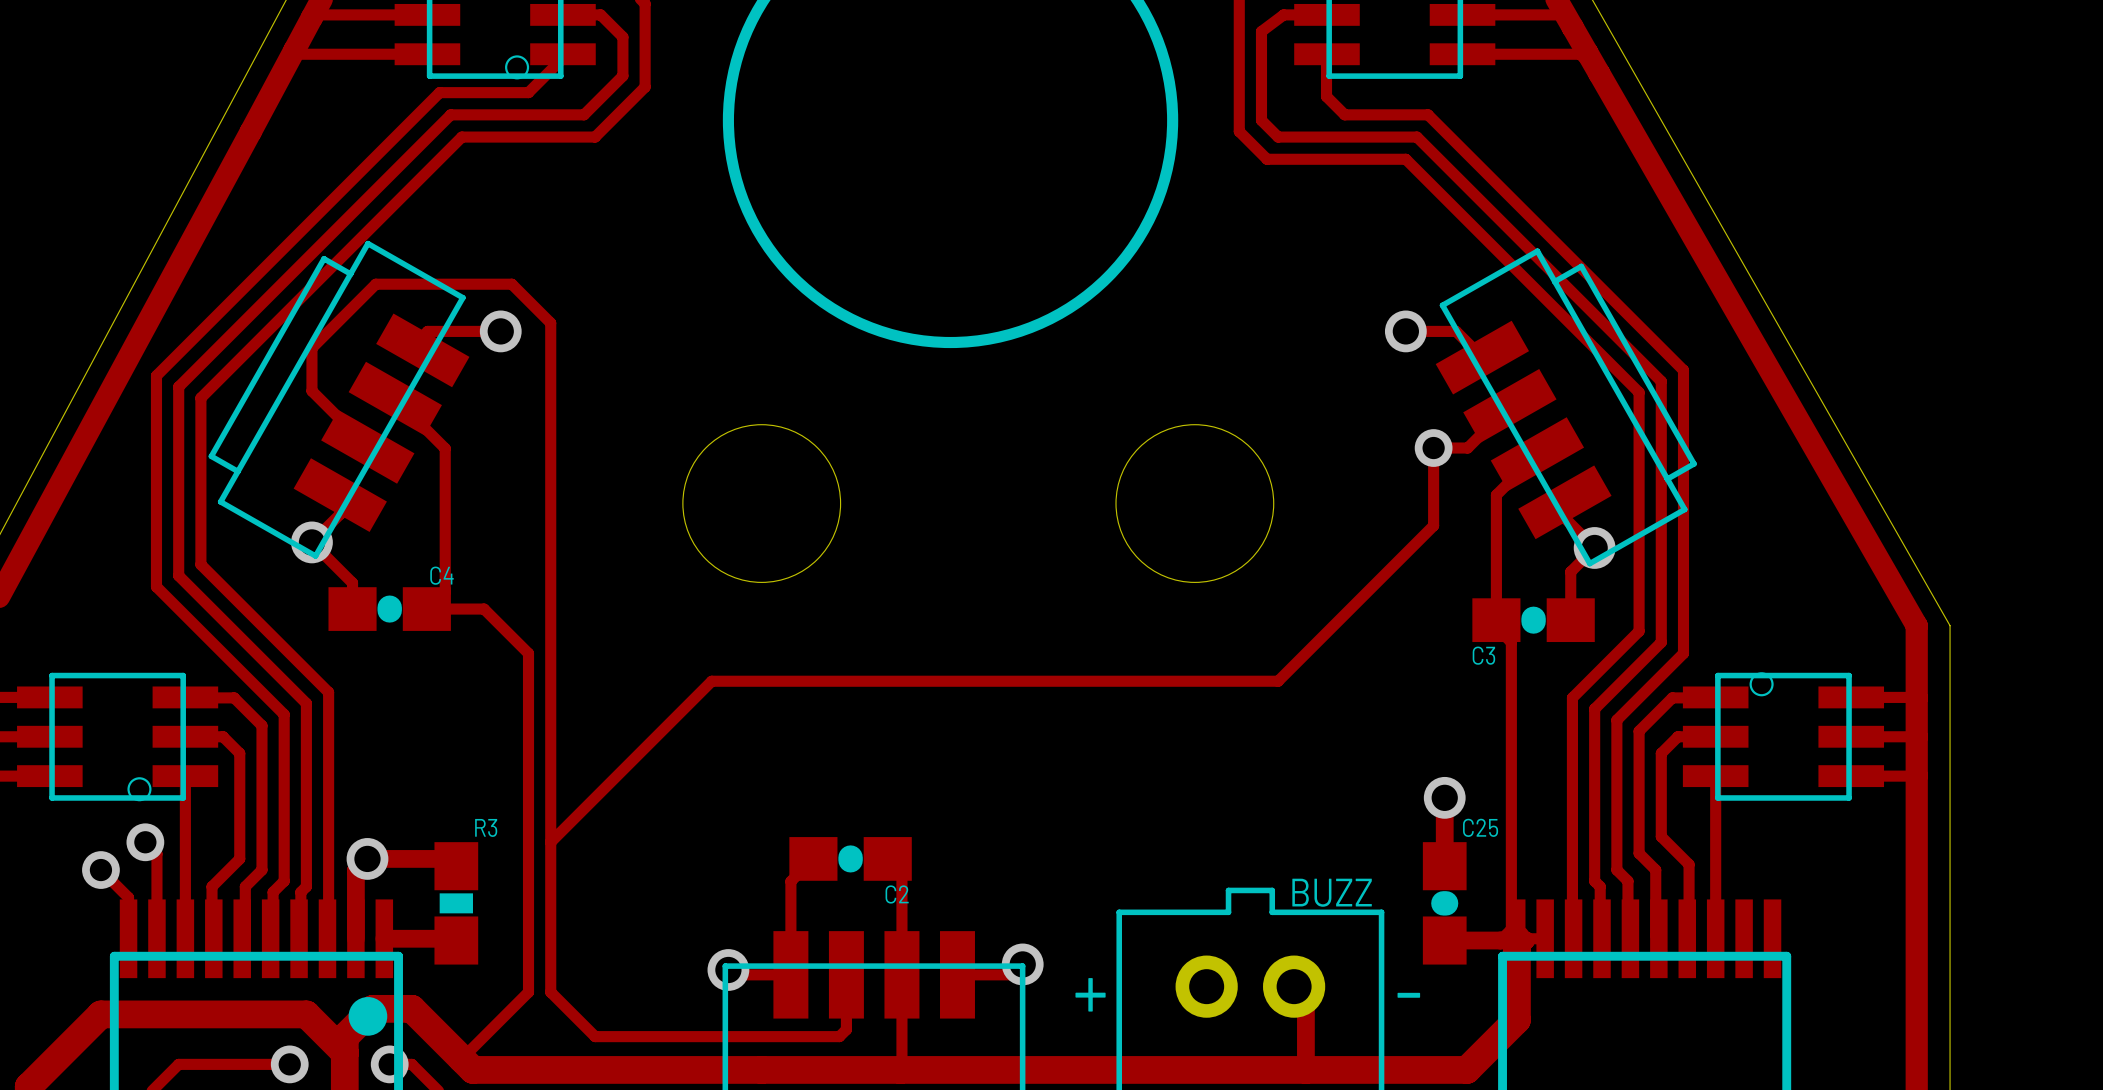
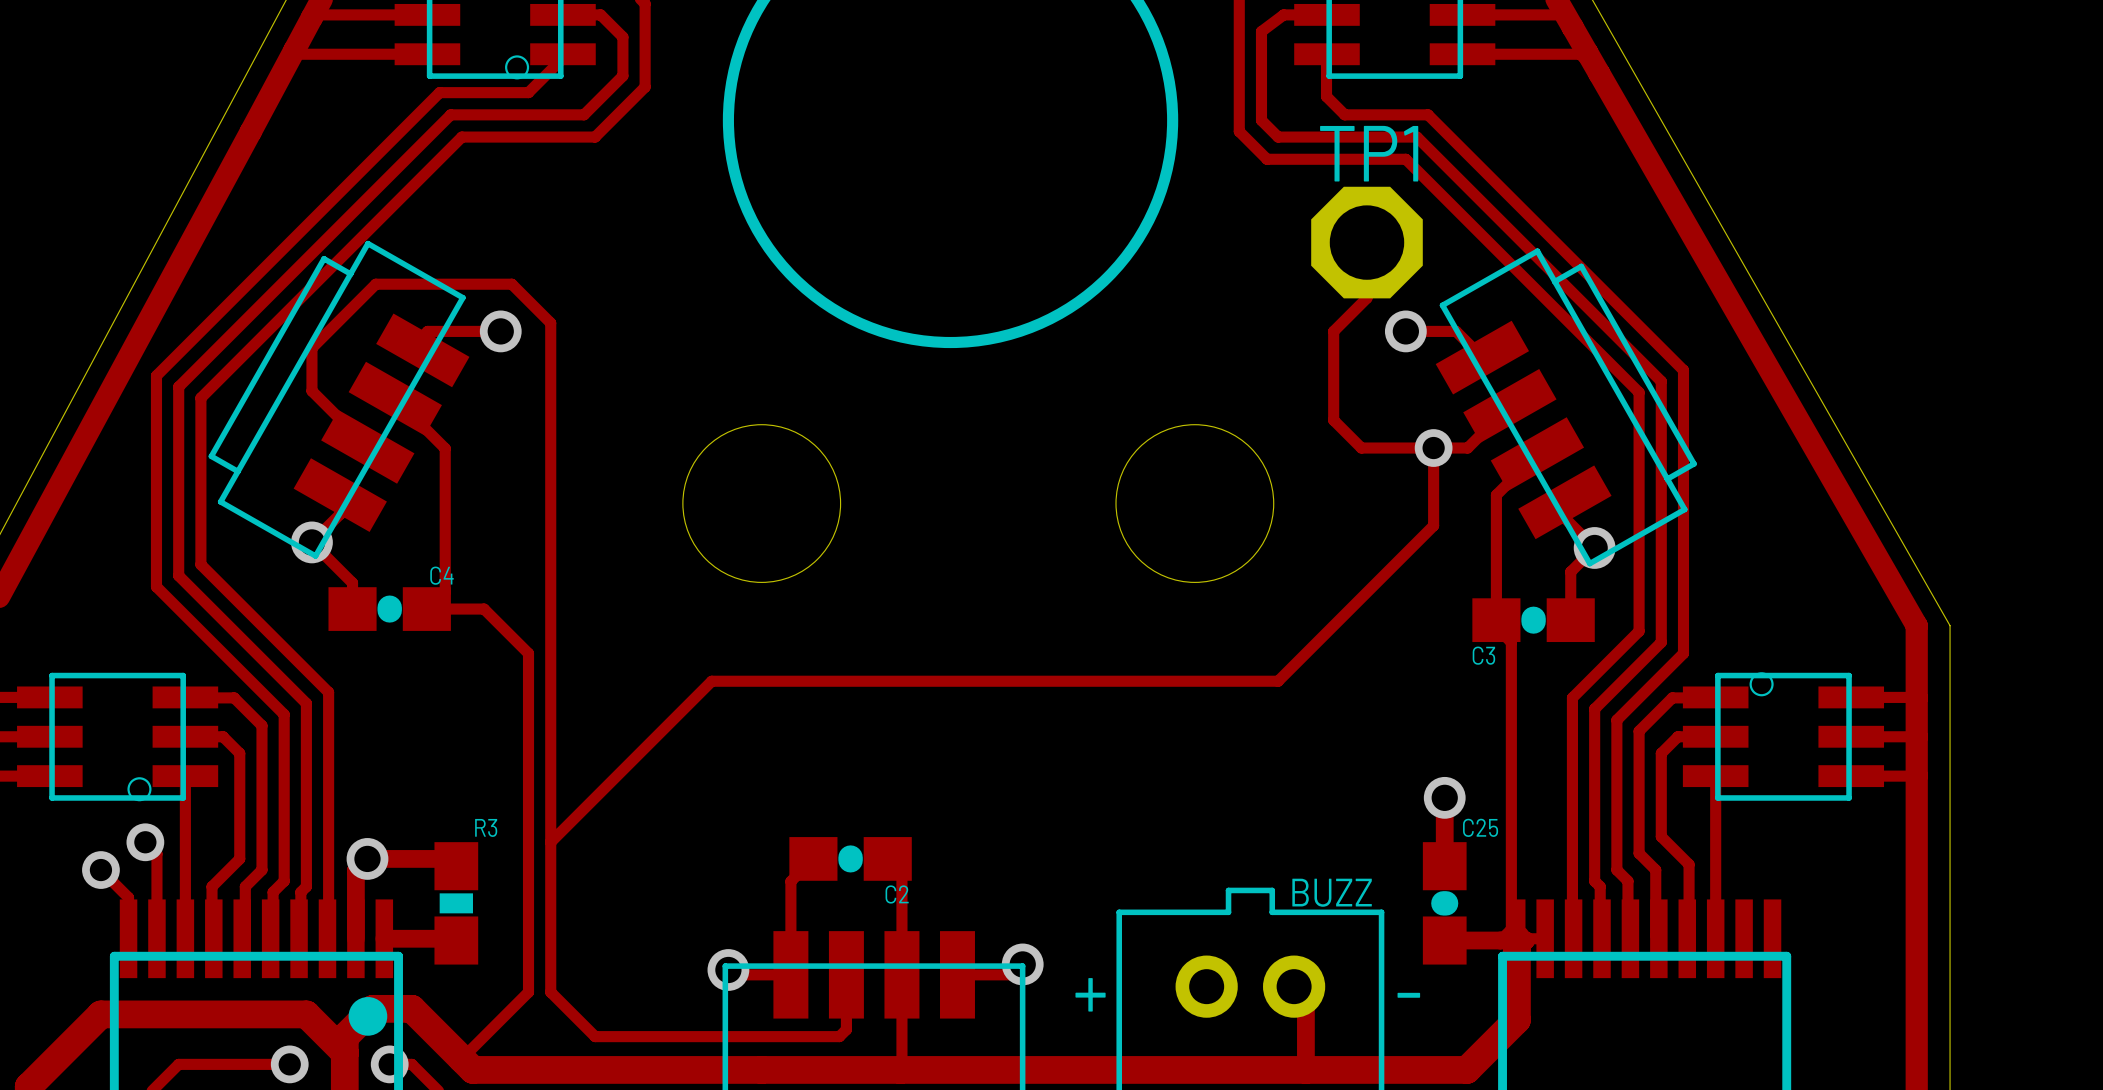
track: none -> (1366, 242) (1366, 298) (1333, 331) (1333, 420) (1361, 448) (1433, 448)
TP1: none -> (1366, 242)

